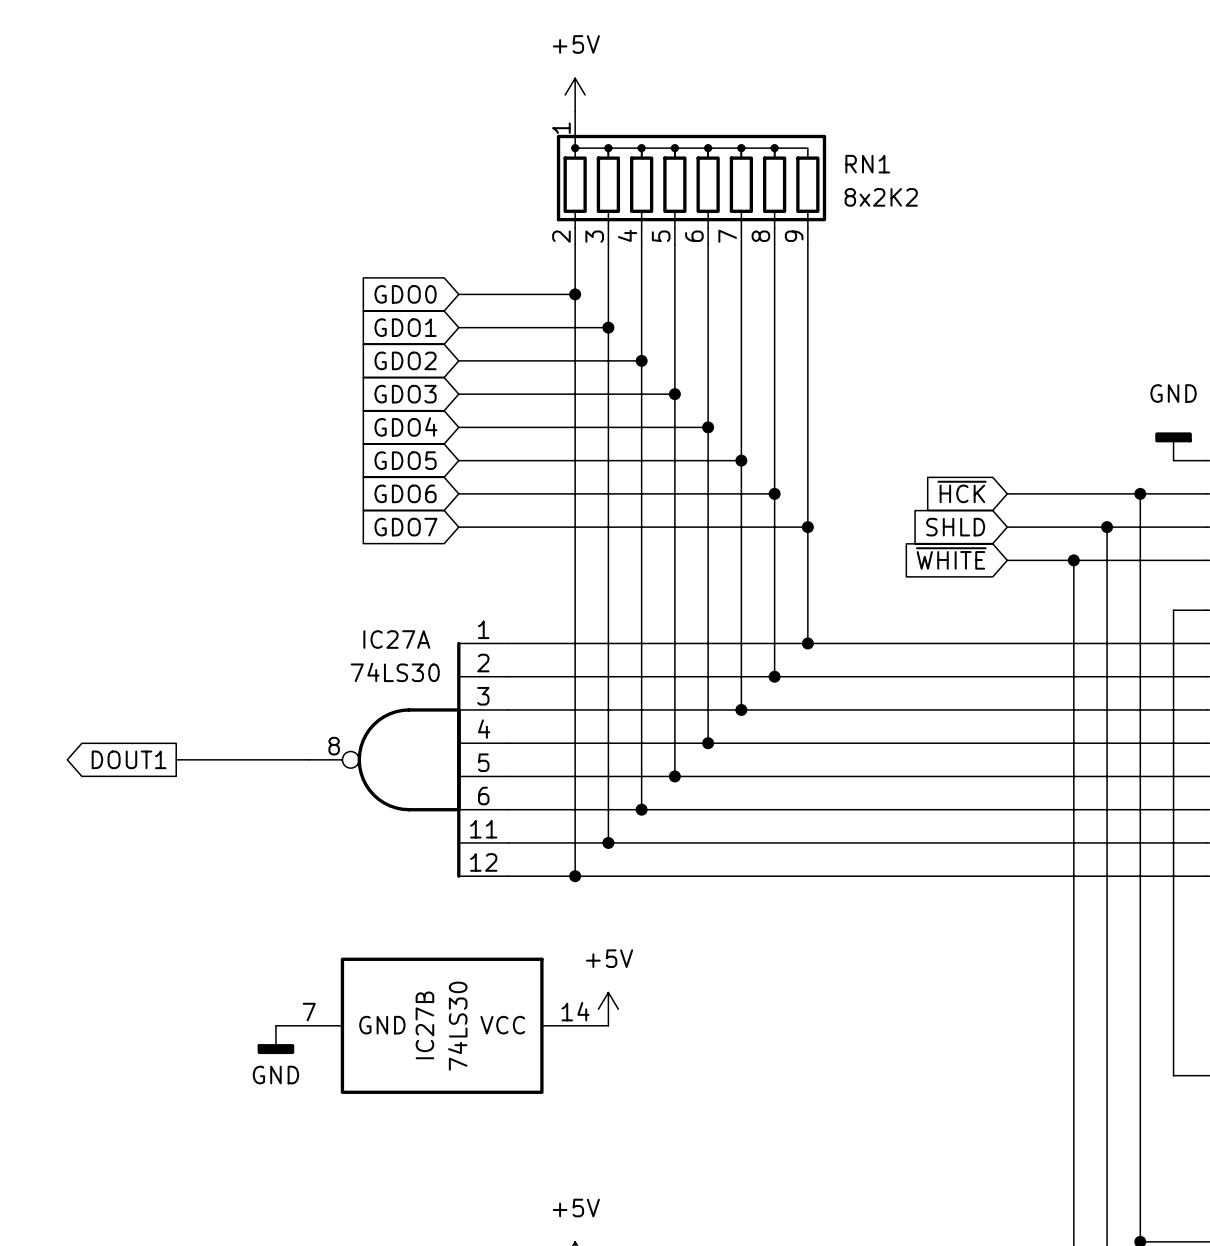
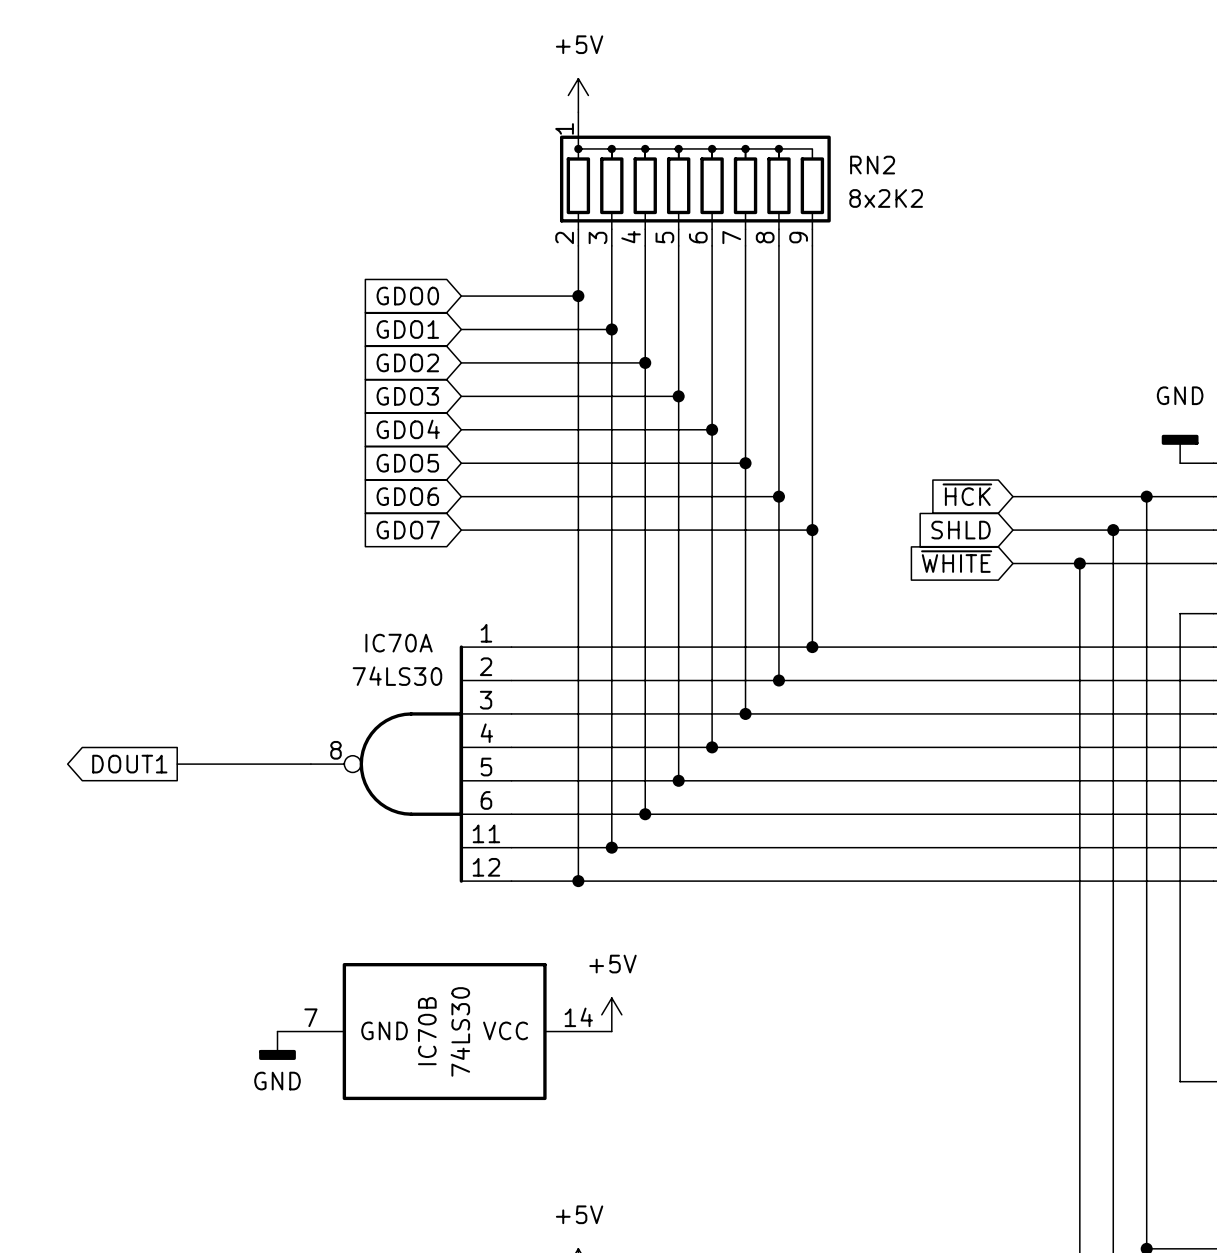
RN1 name: RN1 (867, 164) -> RN2 (872, 165)
IC27A name: IC27A (396, 639) -> IC70A (399, 643)
IC27B name: IC27B (424, 1025) -> IC70B (427, 1031)

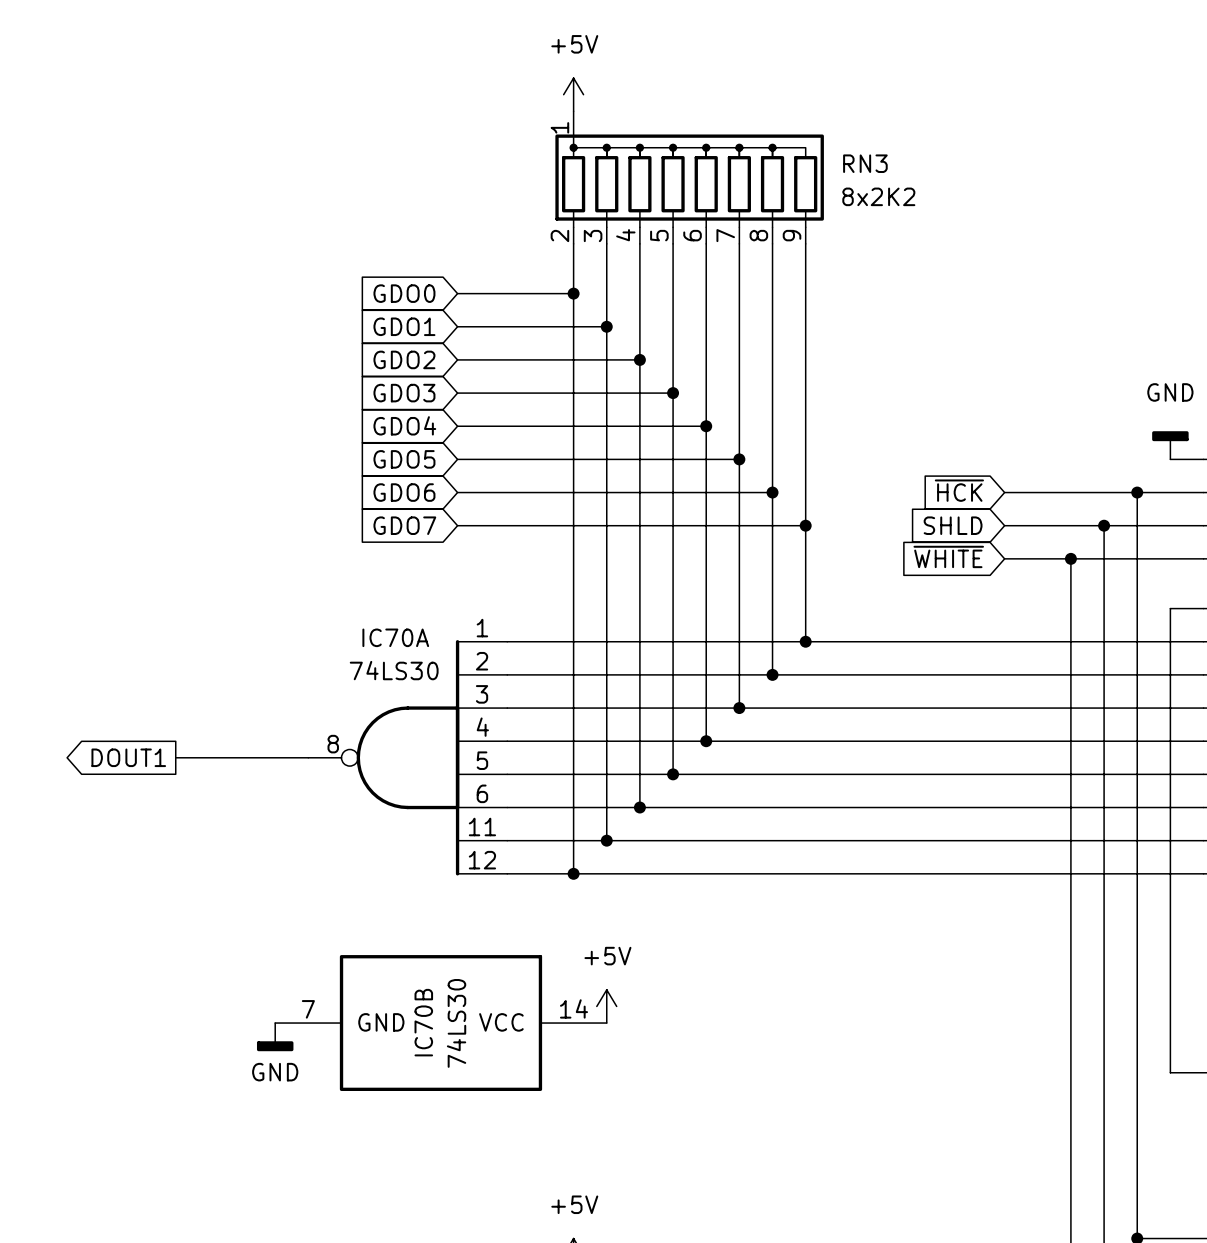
RN2 name: RN2 (872, 165) -> RN3 (865, 163)

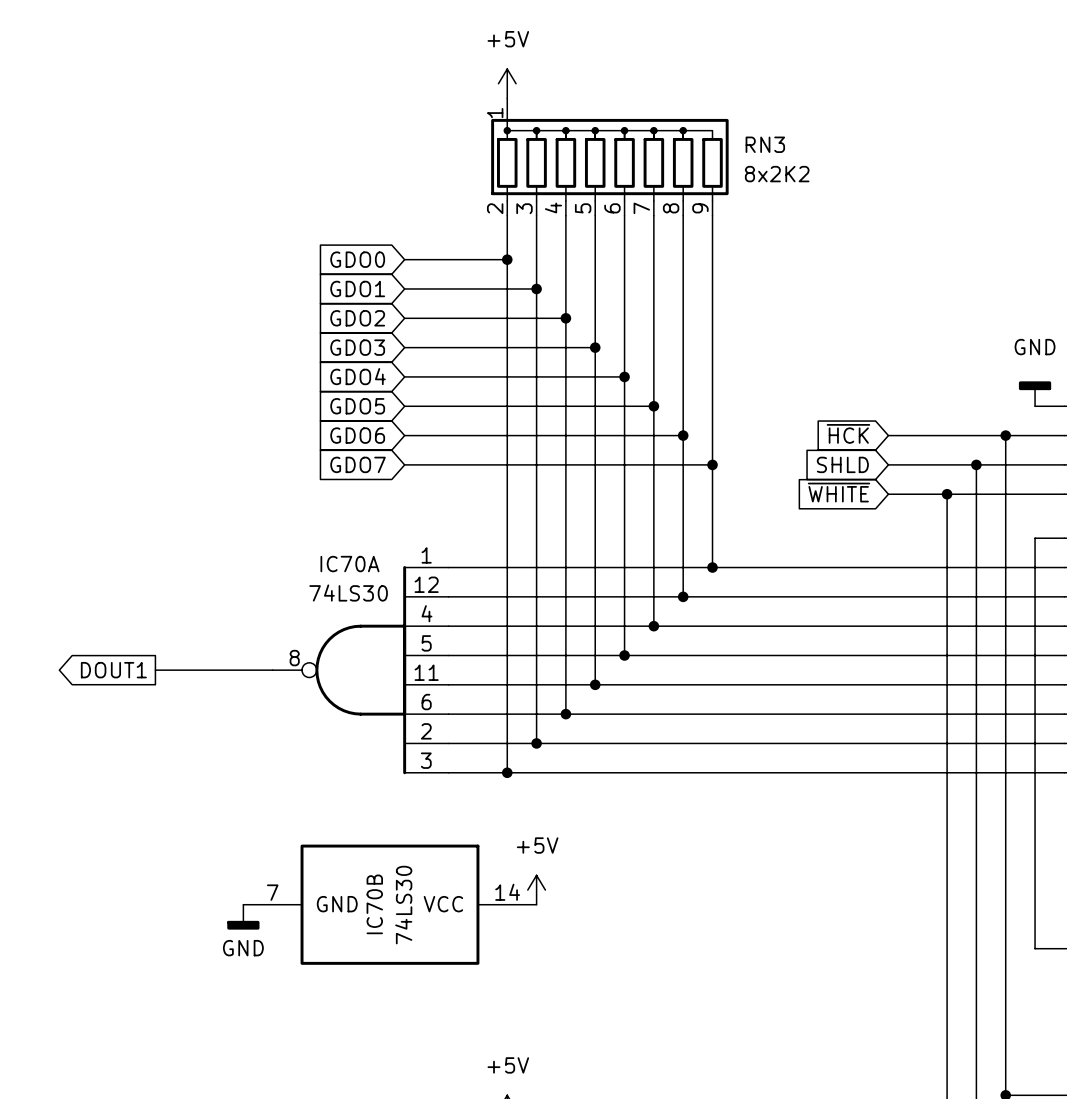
IC70A pin number: 2 (482, 661) -> 12 (426, 584)
IC70A pin number: 3 (482, 694) -> 4 (426, 613)
IC70A pin number: 4 (482, 727) -> 5 (426, 643)
IC70A pin number: 5 (482, 760) -> 11 (426, 672)
IC70A pin number: 11 (482, 827) -> 2 (426, 731)
IC70A pin number: 12 (482, 860) -> 3 (426, 760)

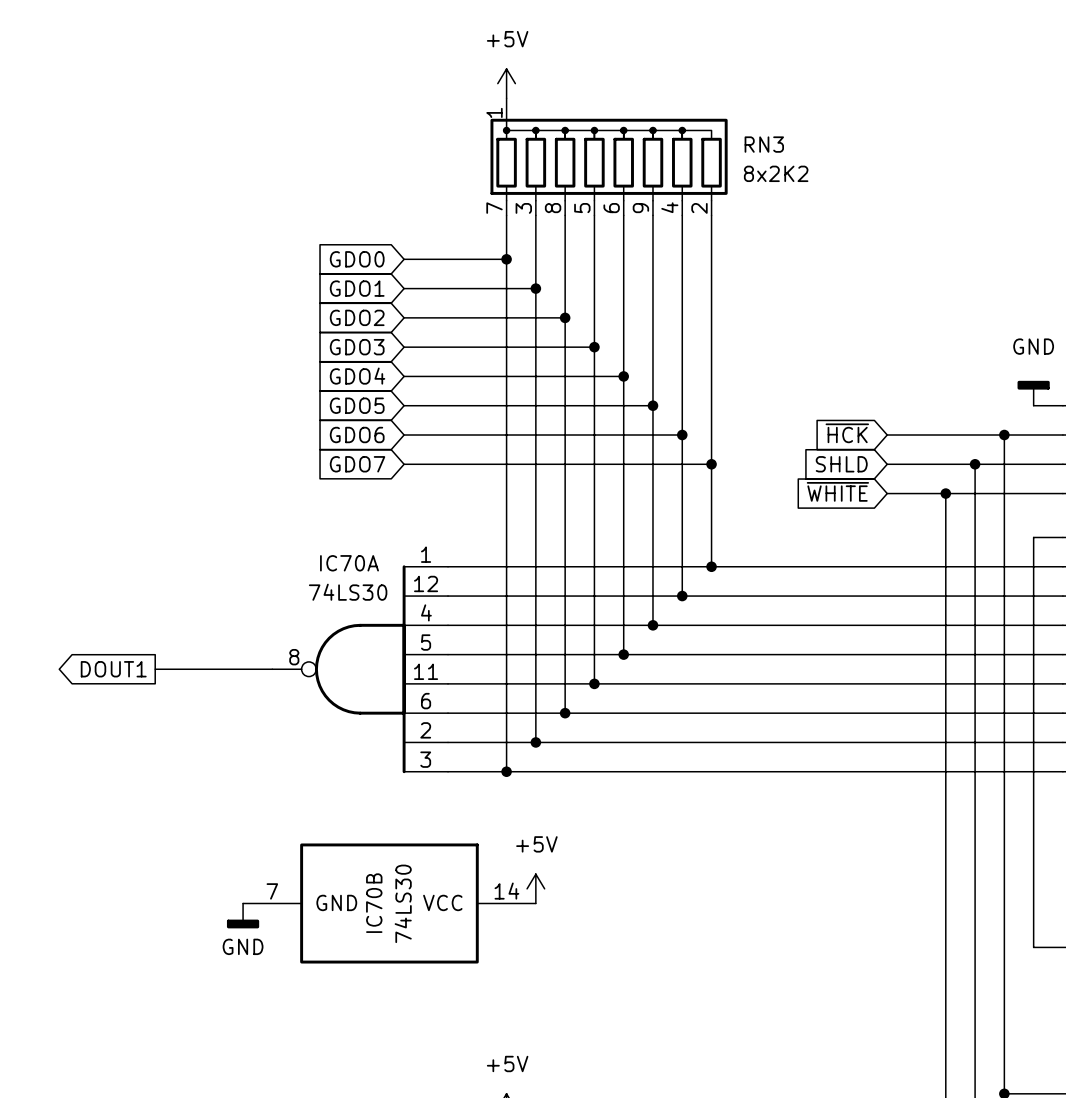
RN3 pin number: 2 (495, 208) -> 7 (494, 208)
RN3 pin number: 4 (553, 208) -> 8 (553, 208)
RN3 pin number: 7 (641, 208) -> 9 (640, 208)
RN3 pin number: 8 (671, 208) -> 4 (669, 207)
RN3 pin number: 9 (700, 208) -> 2 (699, 208)

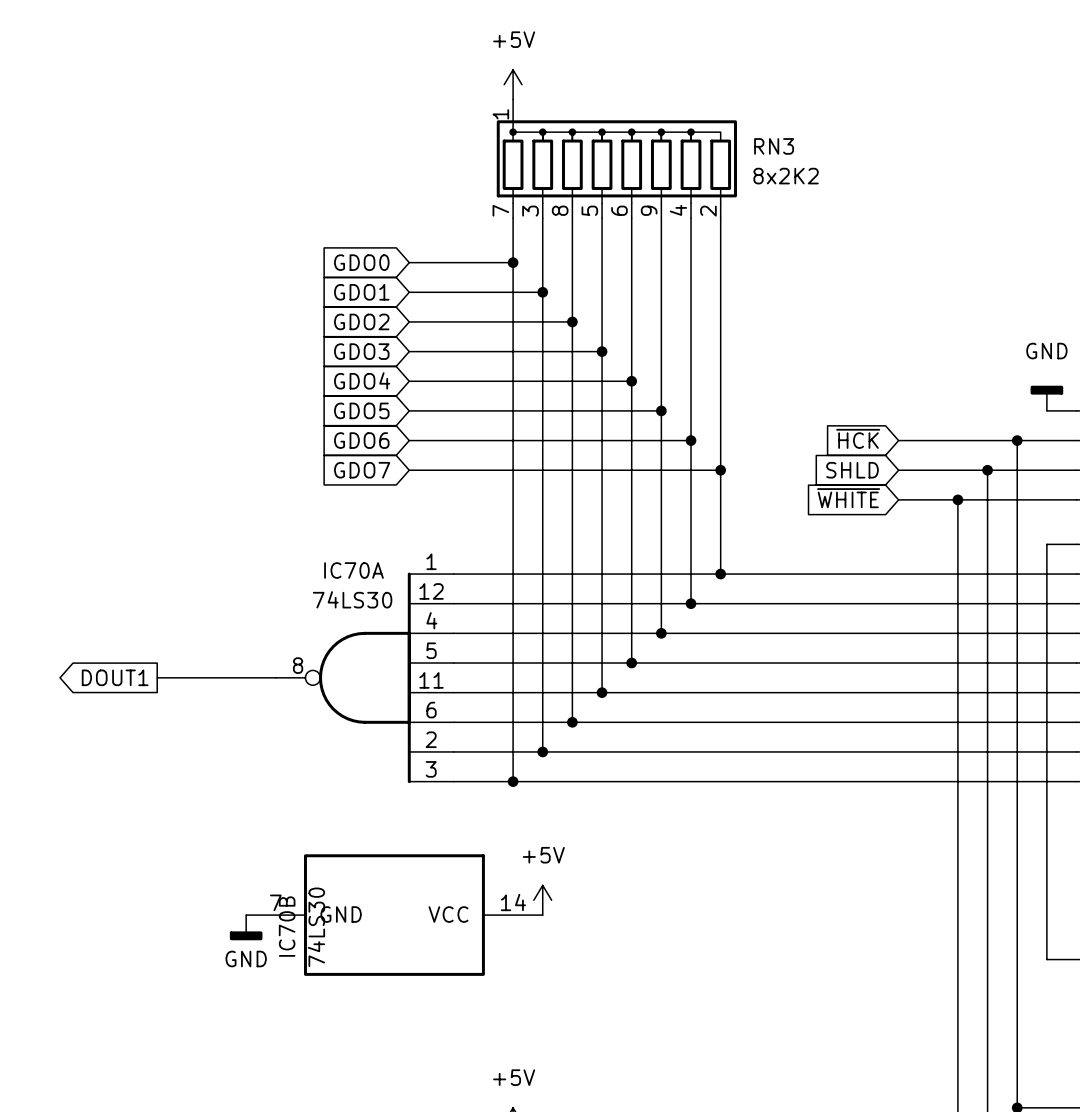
IC70B name position: IC70B (374, 903) -> IC70B (287, 926)
IC70B value position: 74LS30 (403, 903) -> 74LS30 (316, 927)

